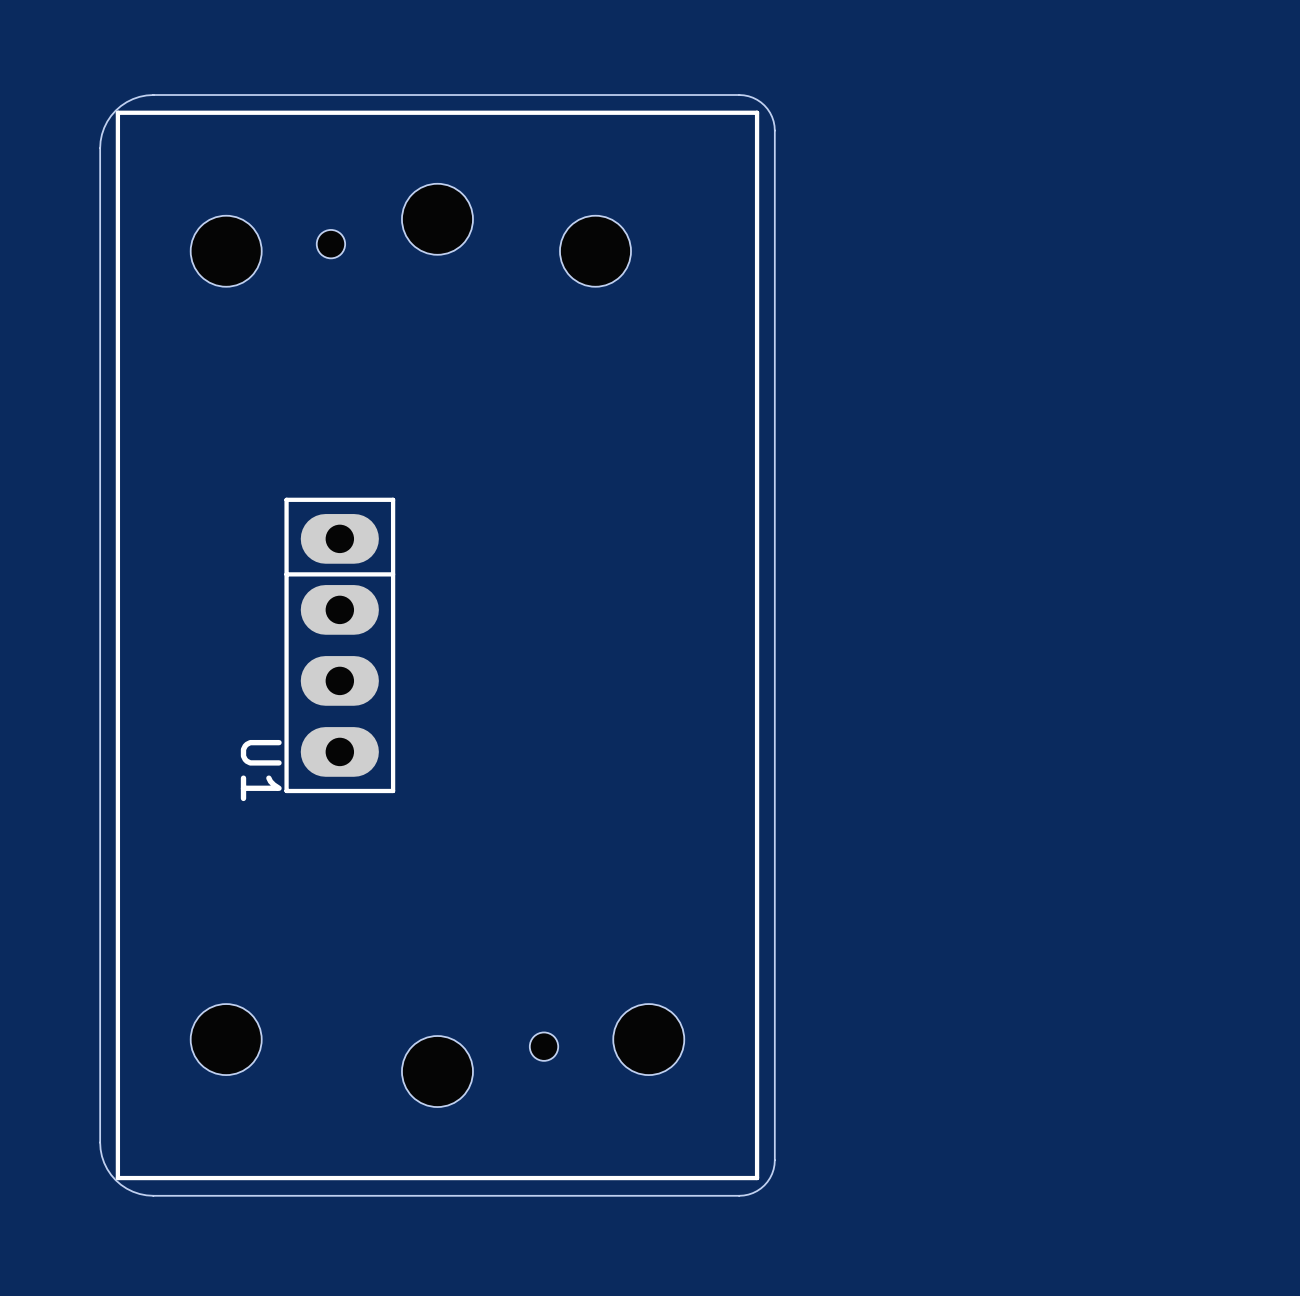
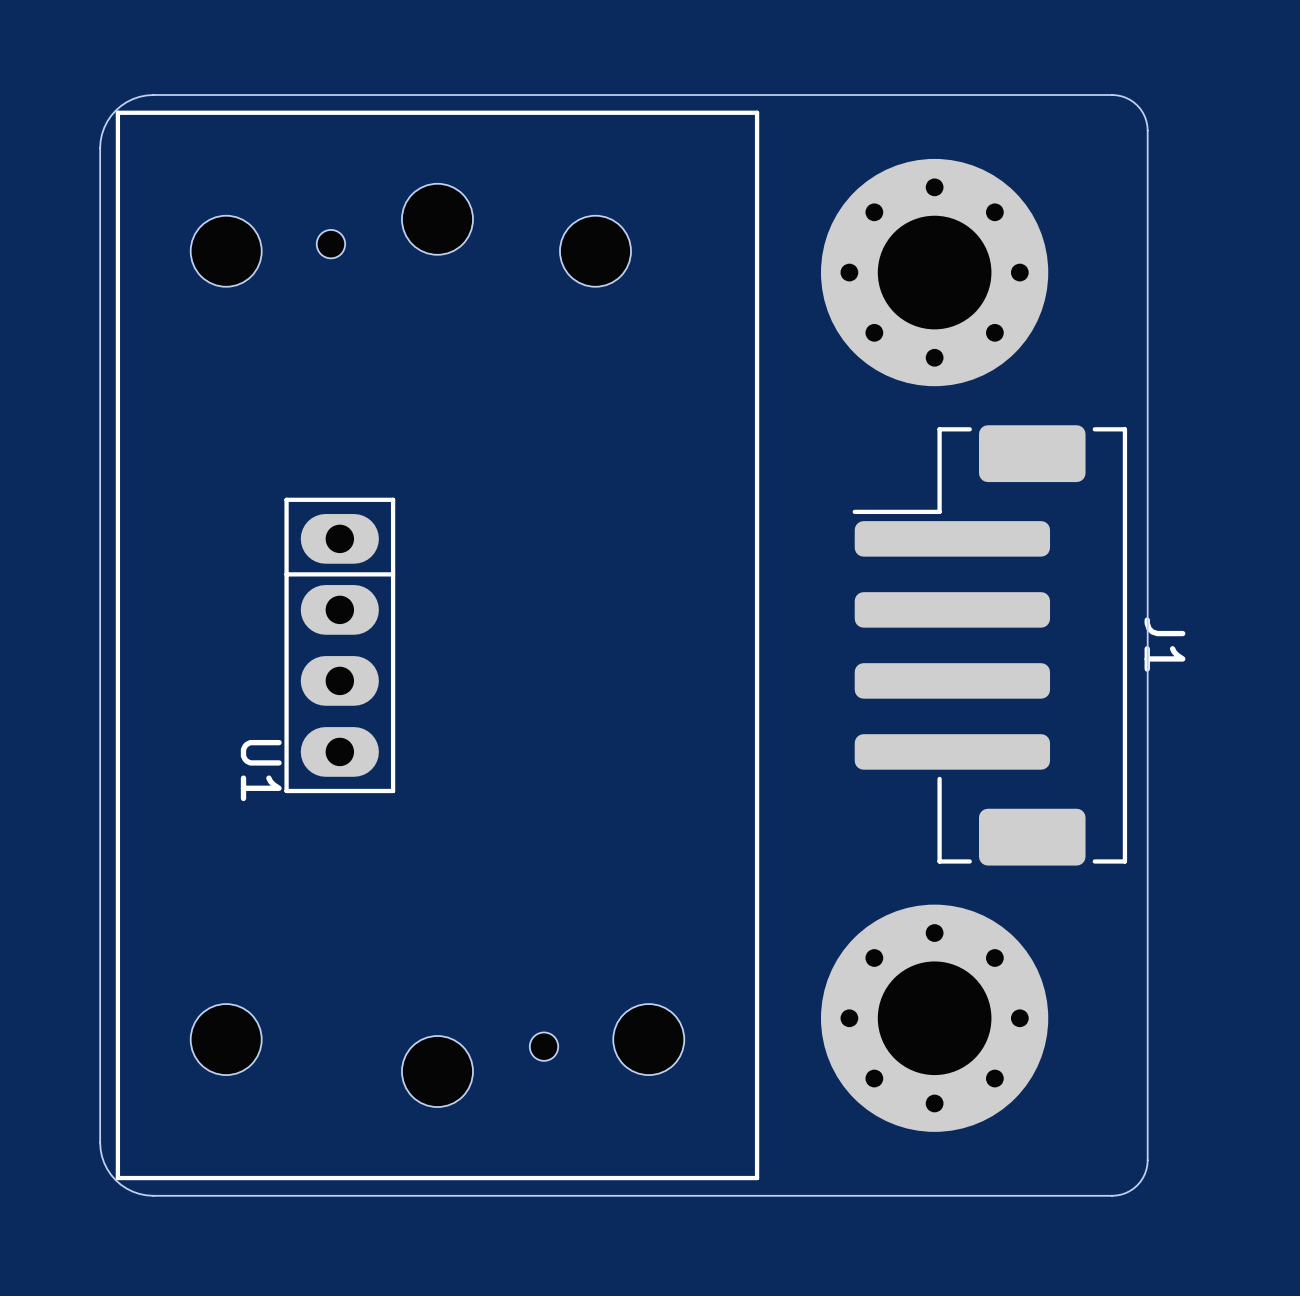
board edge: (739, 95) (752, 97) (764, 105) (772, 116) (774, 130) (774, 1160) (772, 1173) (764, 1185) (752, 1193) (739, 1195) -> (739, 95) (1116, 95) (1129, 99) (1140, 108) (1146, 121) (1147, 130) (1147, 1160) (1144, 1173) (1133, 1188) (1125, 1193) (1112, 1195) (739, 1195)
part: none -> (934, 272)
J1: none -> (989, 645)
part: none -> (934, 1018)

